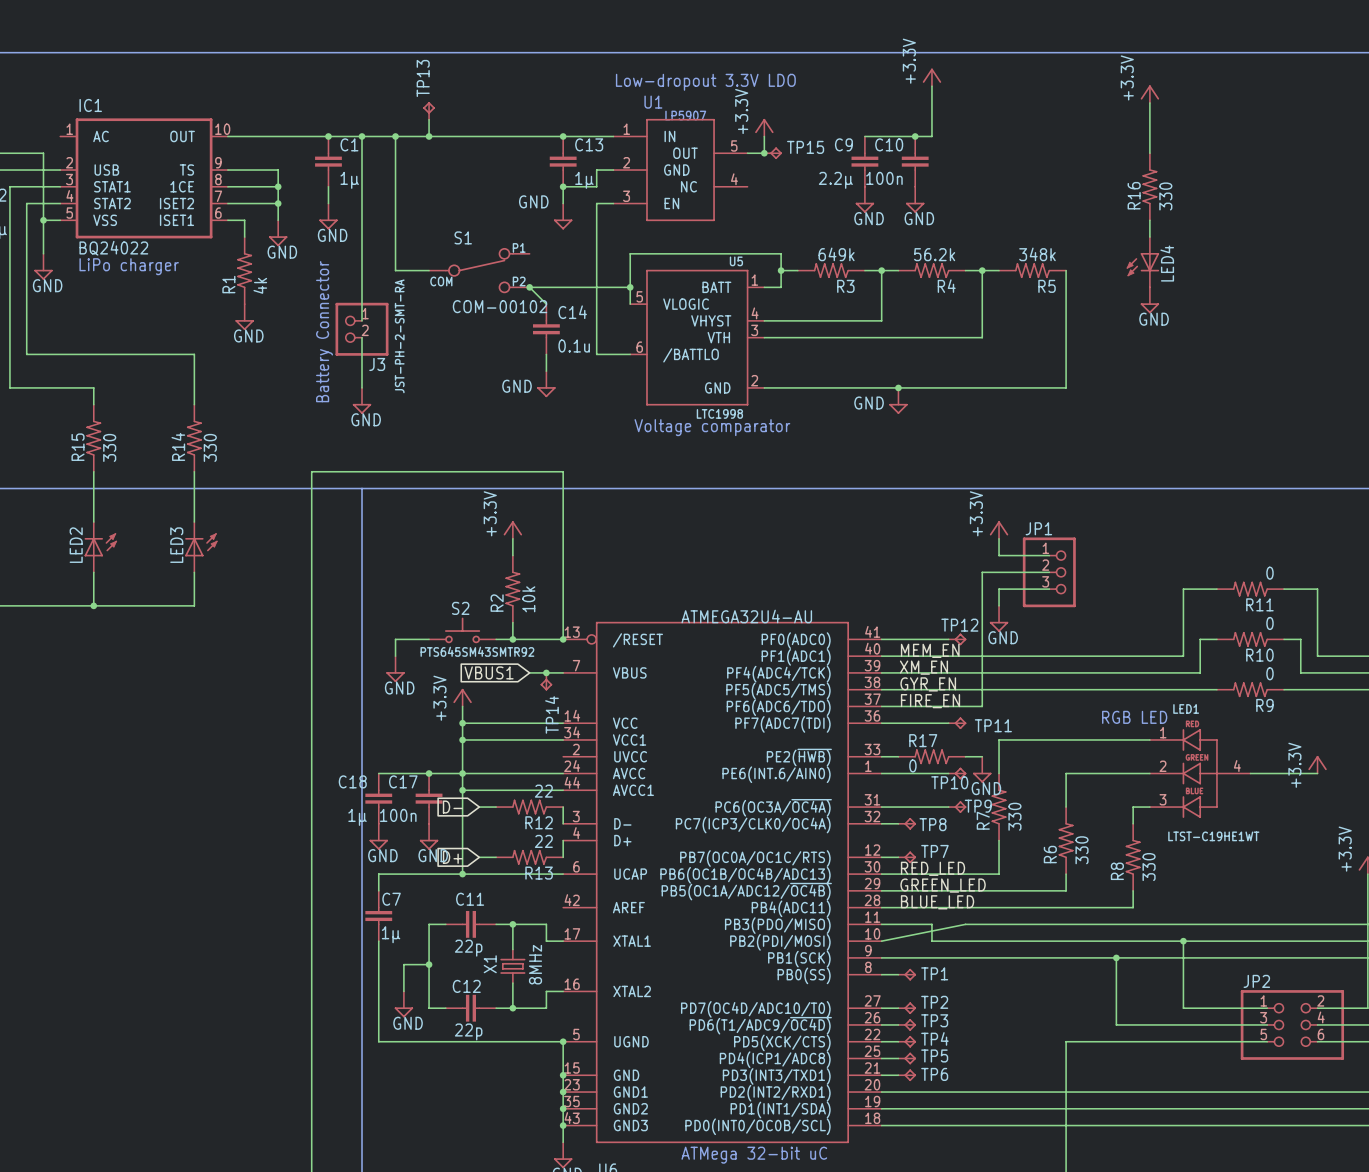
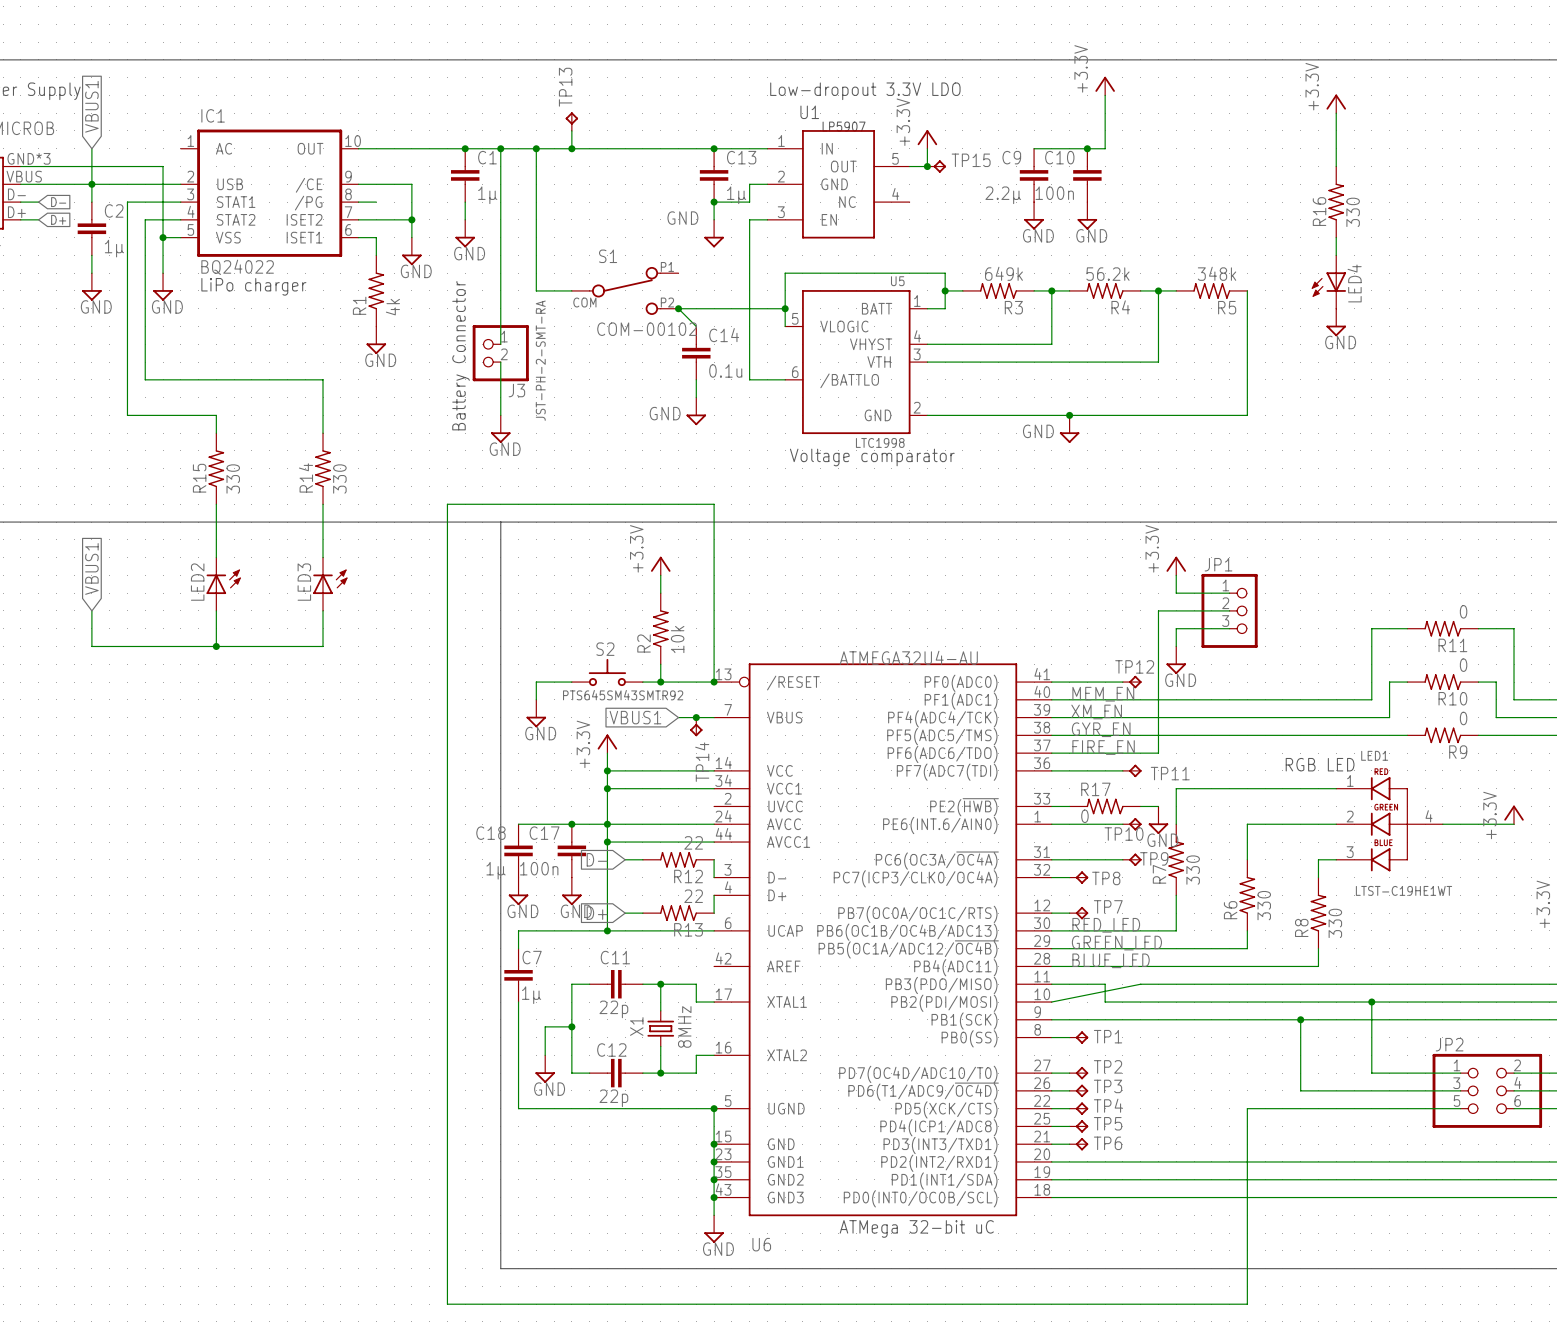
IC1 pin name: TS (186, 170) -> /CE (309, 185)
IC1 pin name: 1CE (182, 186) -> /PG (308, 203)
wire: (244, 186) (278, 186) -> none
junction: (278, 186) -> none

